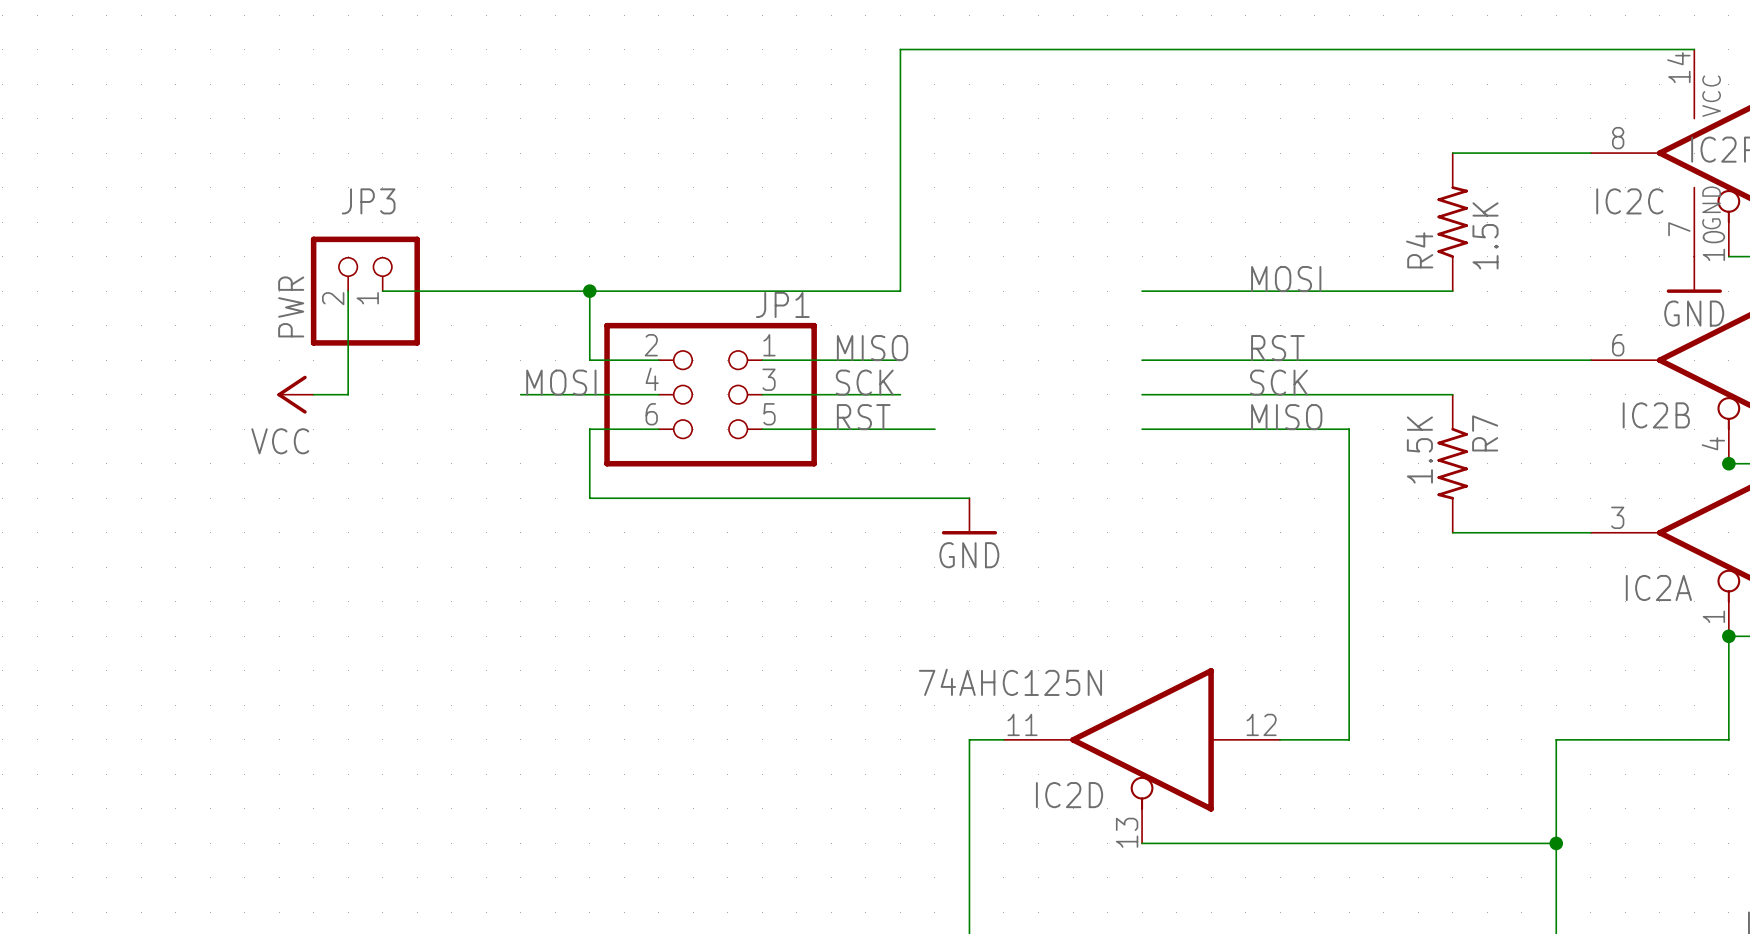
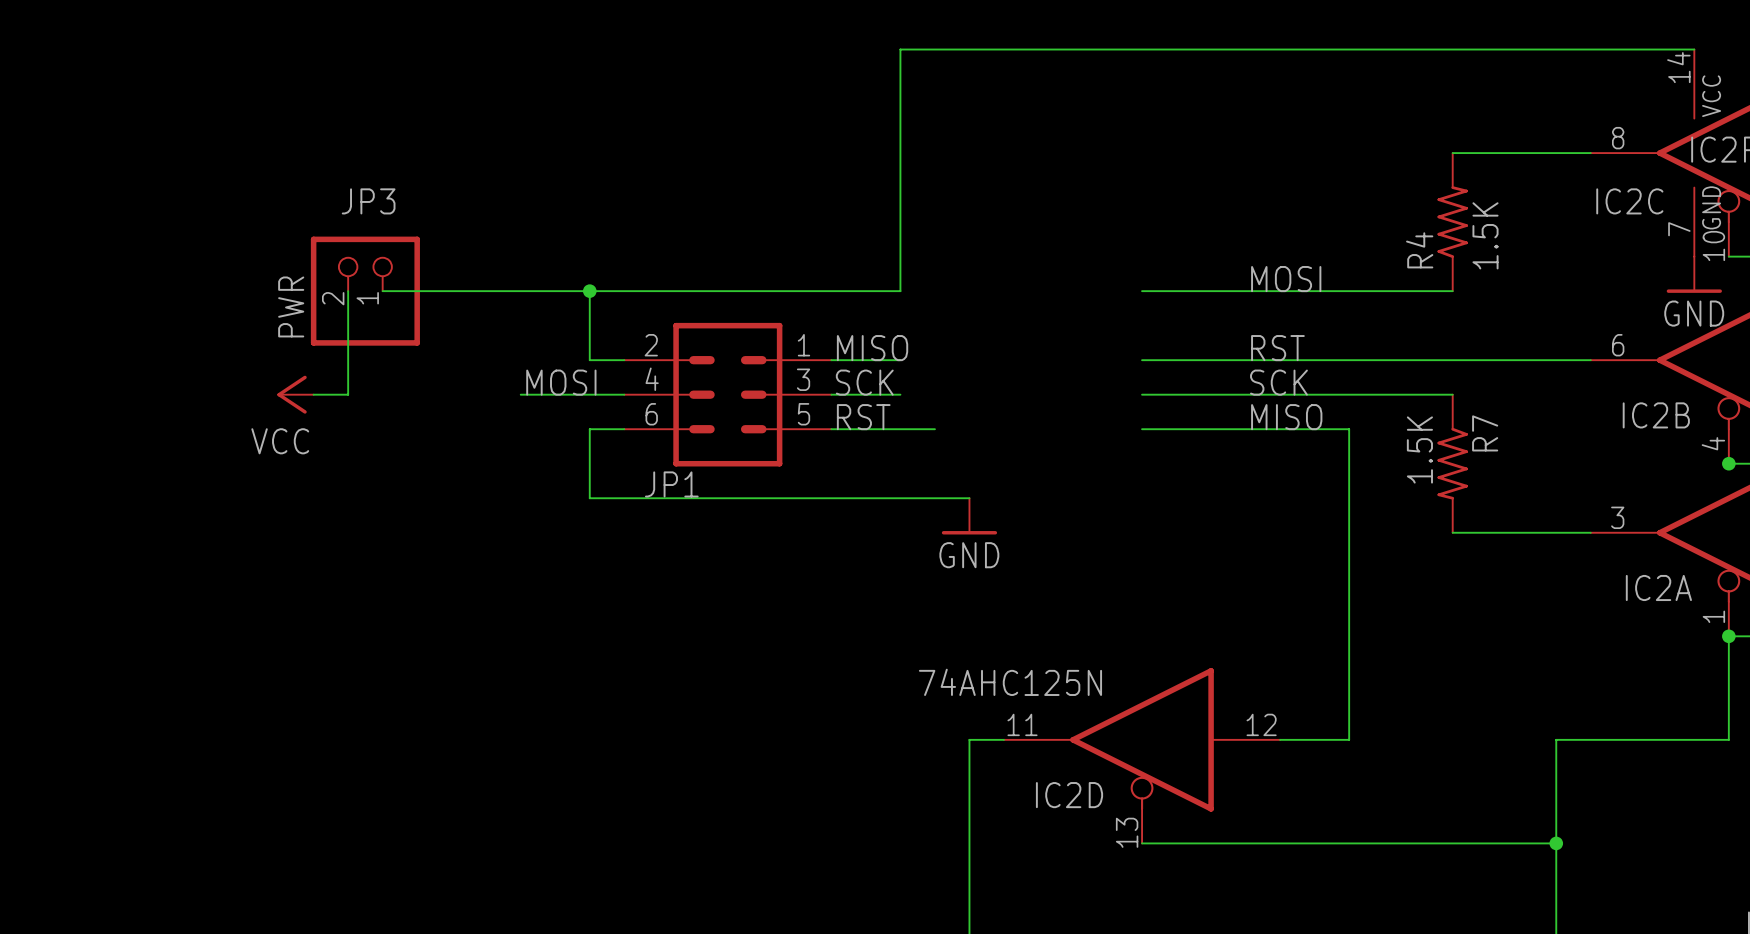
JP1 name position: JP1 (782, 304) -> JP1 (671, 484)
JP1 symbol: [604, 322, 817, 467] -> [624, 322, 832, 467]

